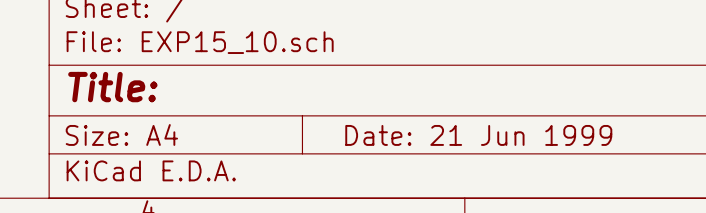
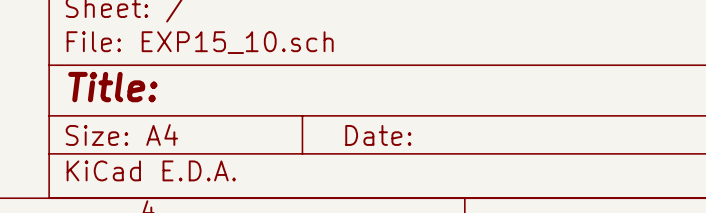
title block: Date: 21 Jun 1999 (478, 135) -> Date: (378, 135)

